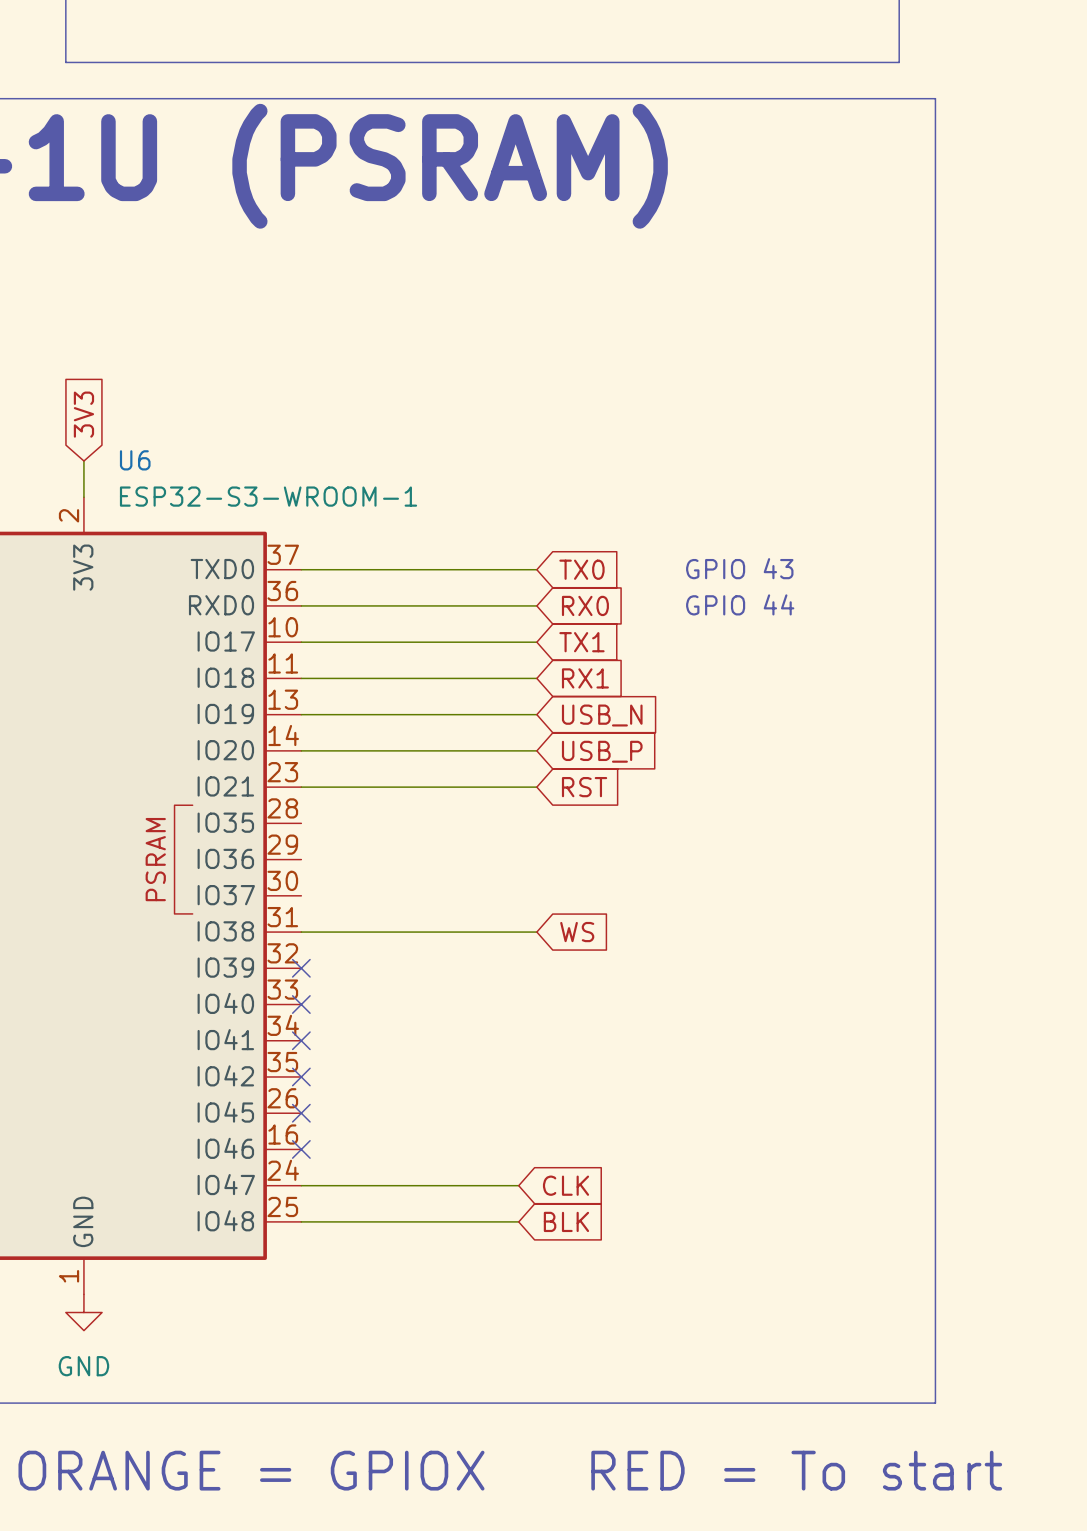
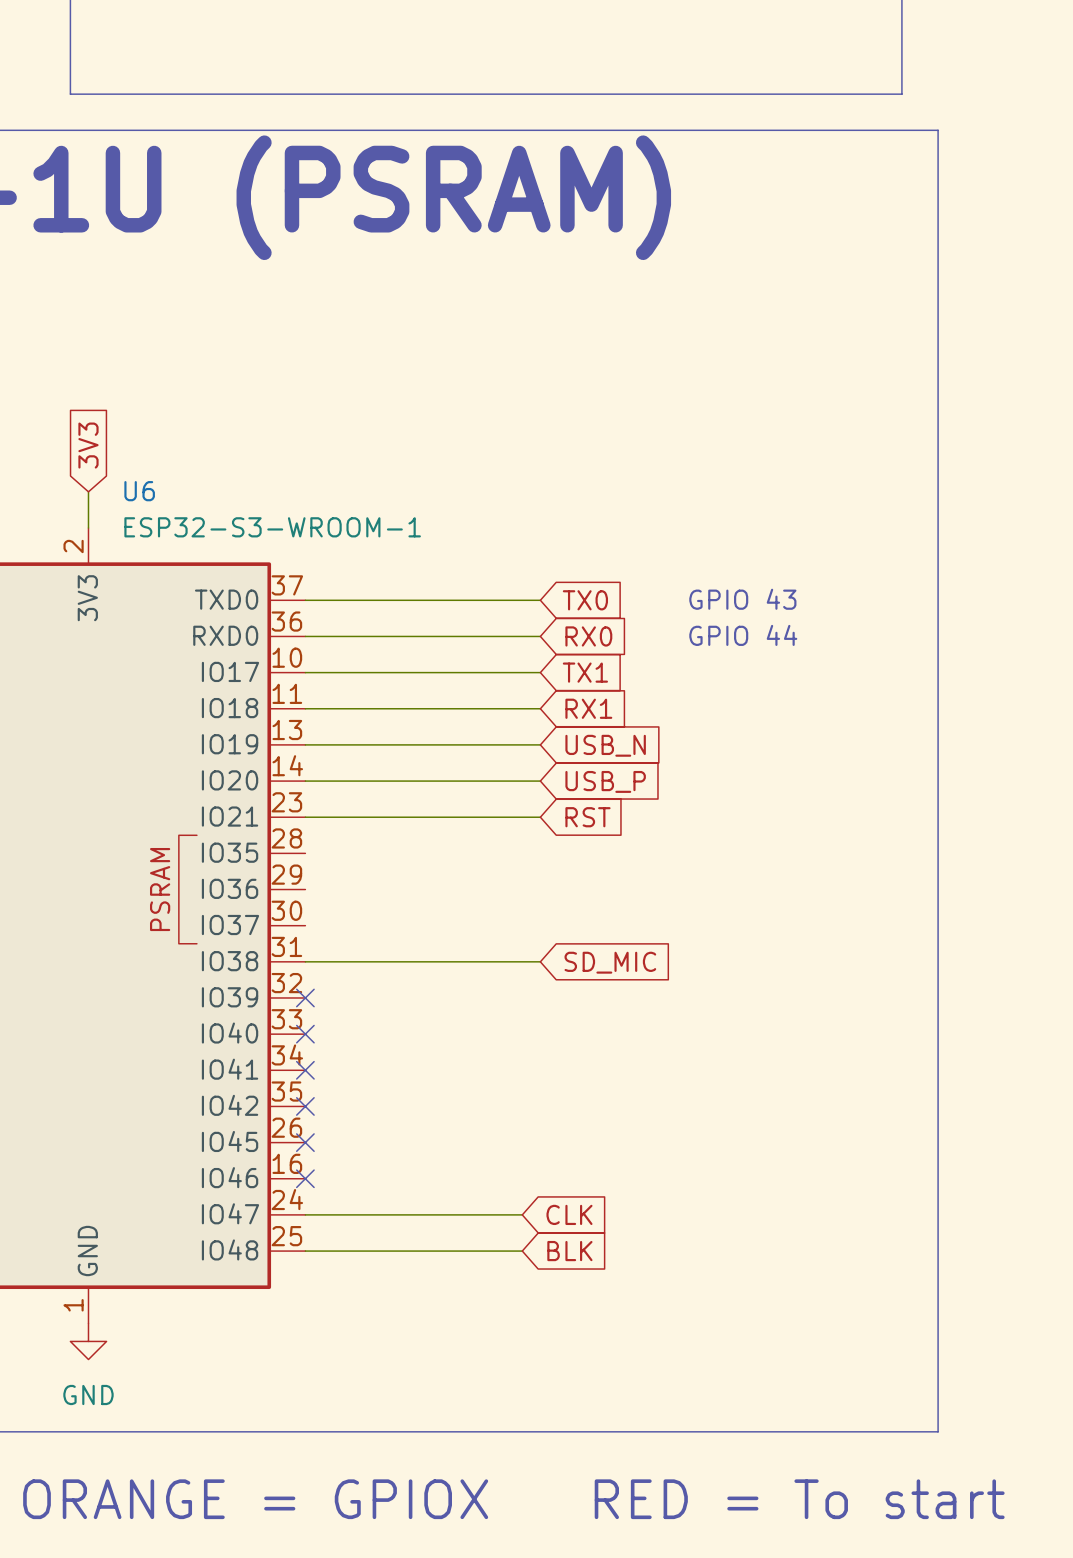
global label: WS (577, 932) -> SD_MIC (610, 962)

